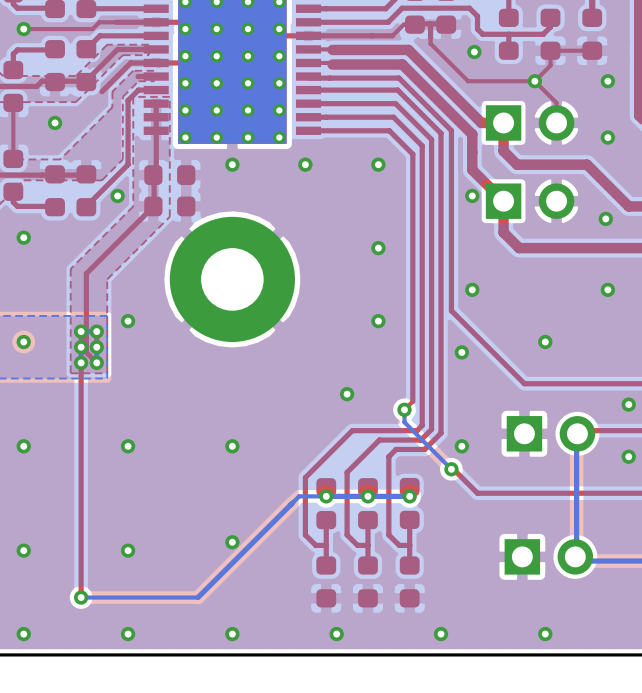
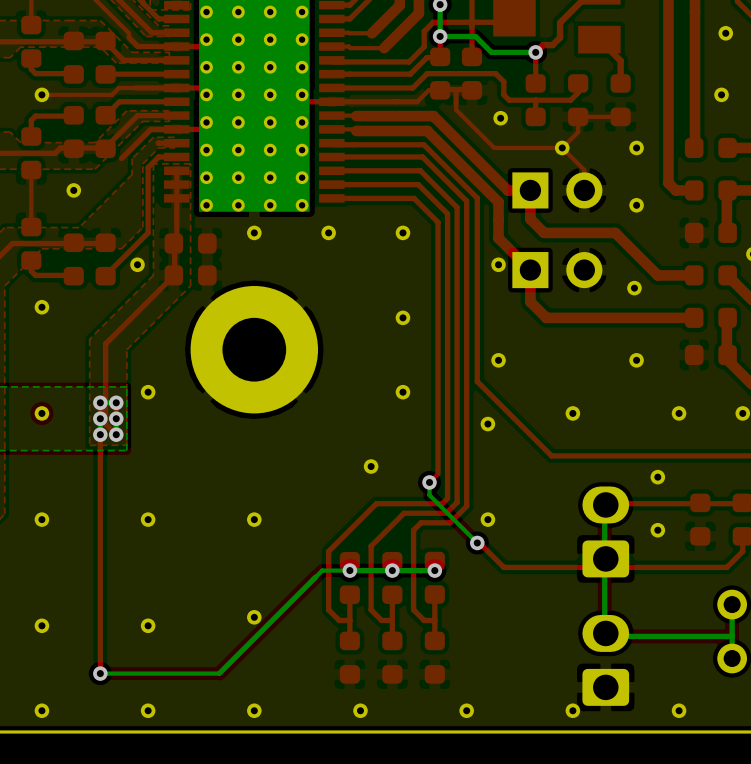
part: (550, 433) -> none
part: none -> (605, 531)
part: (548, 556) -> none
part: none -> (605, 660)

